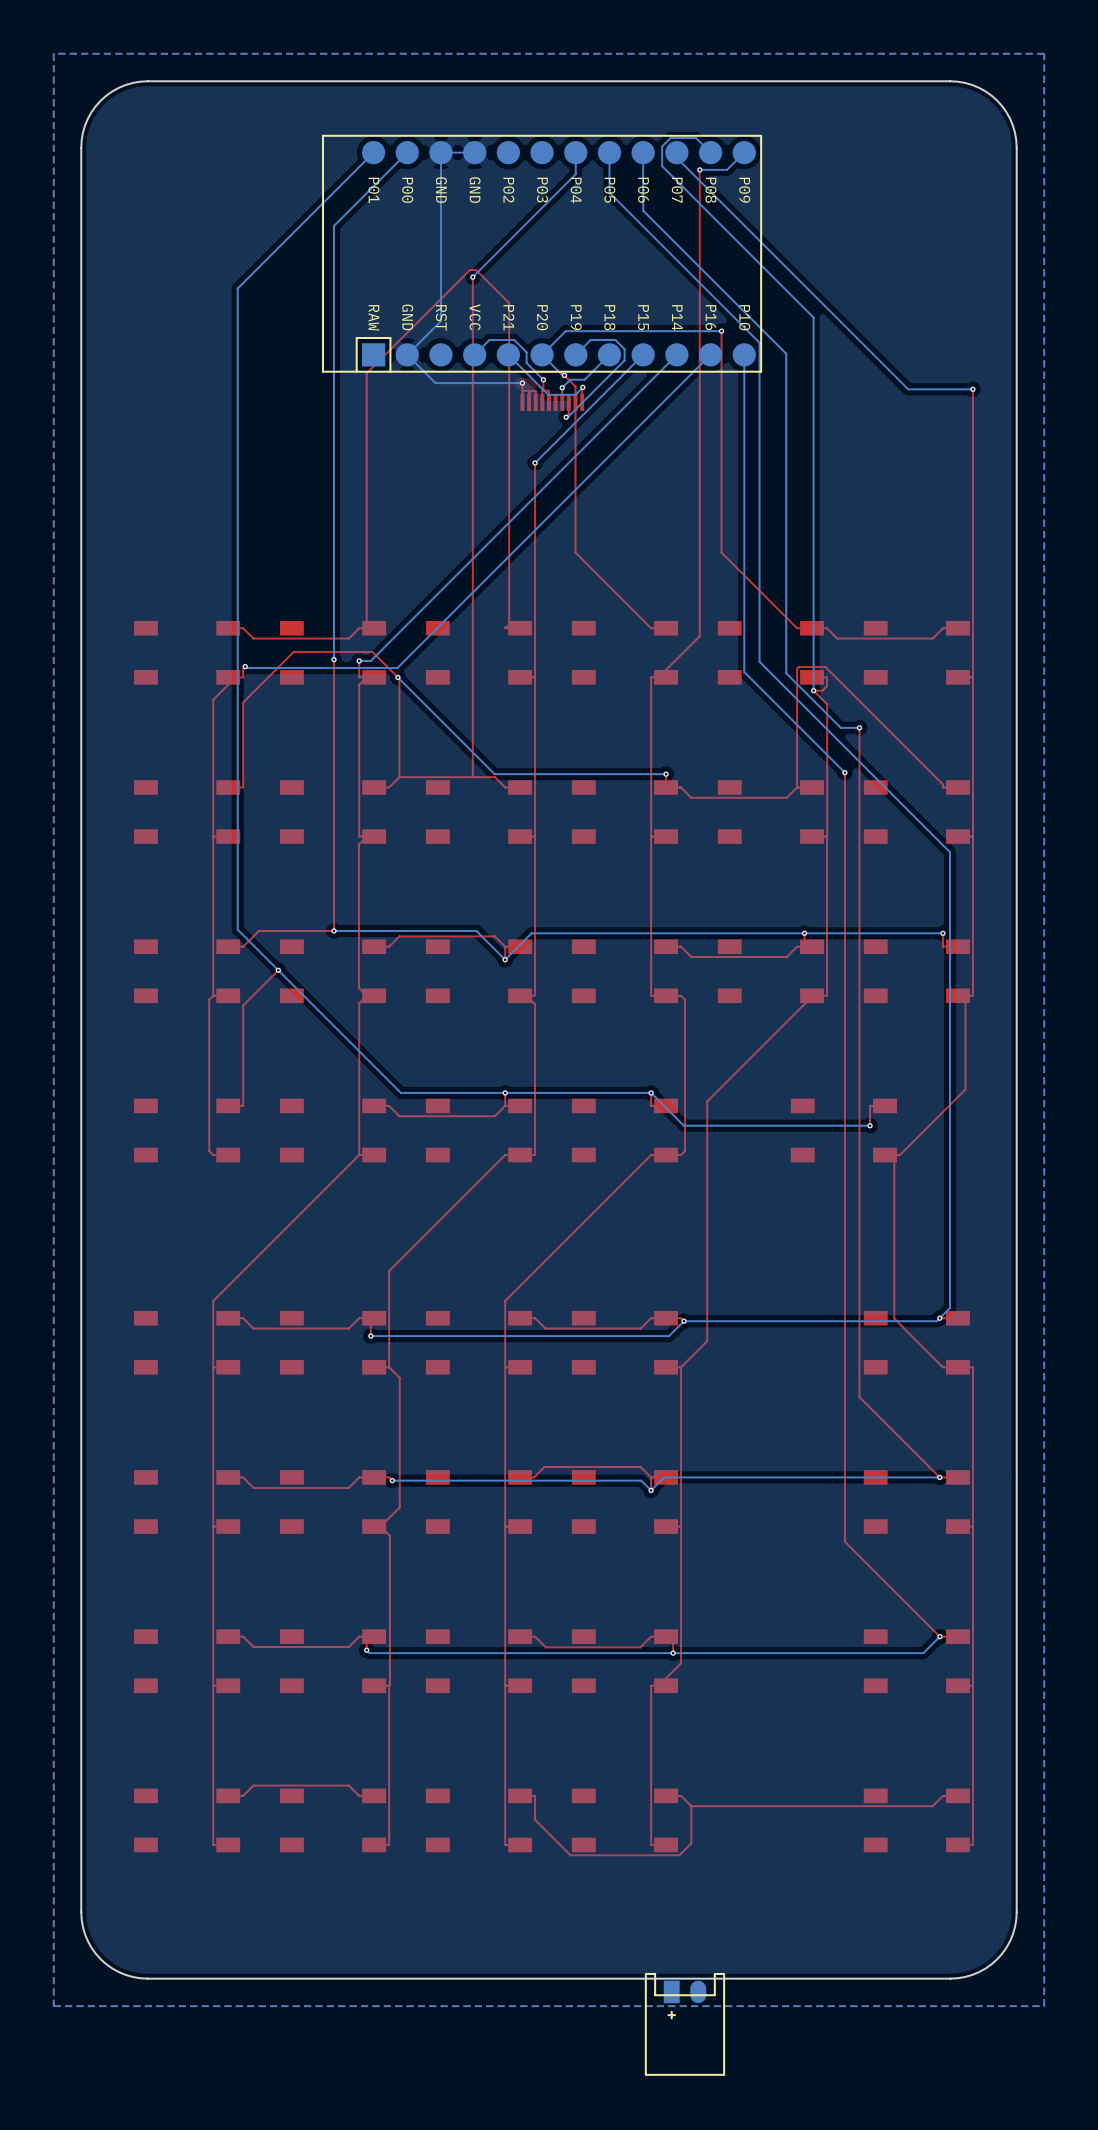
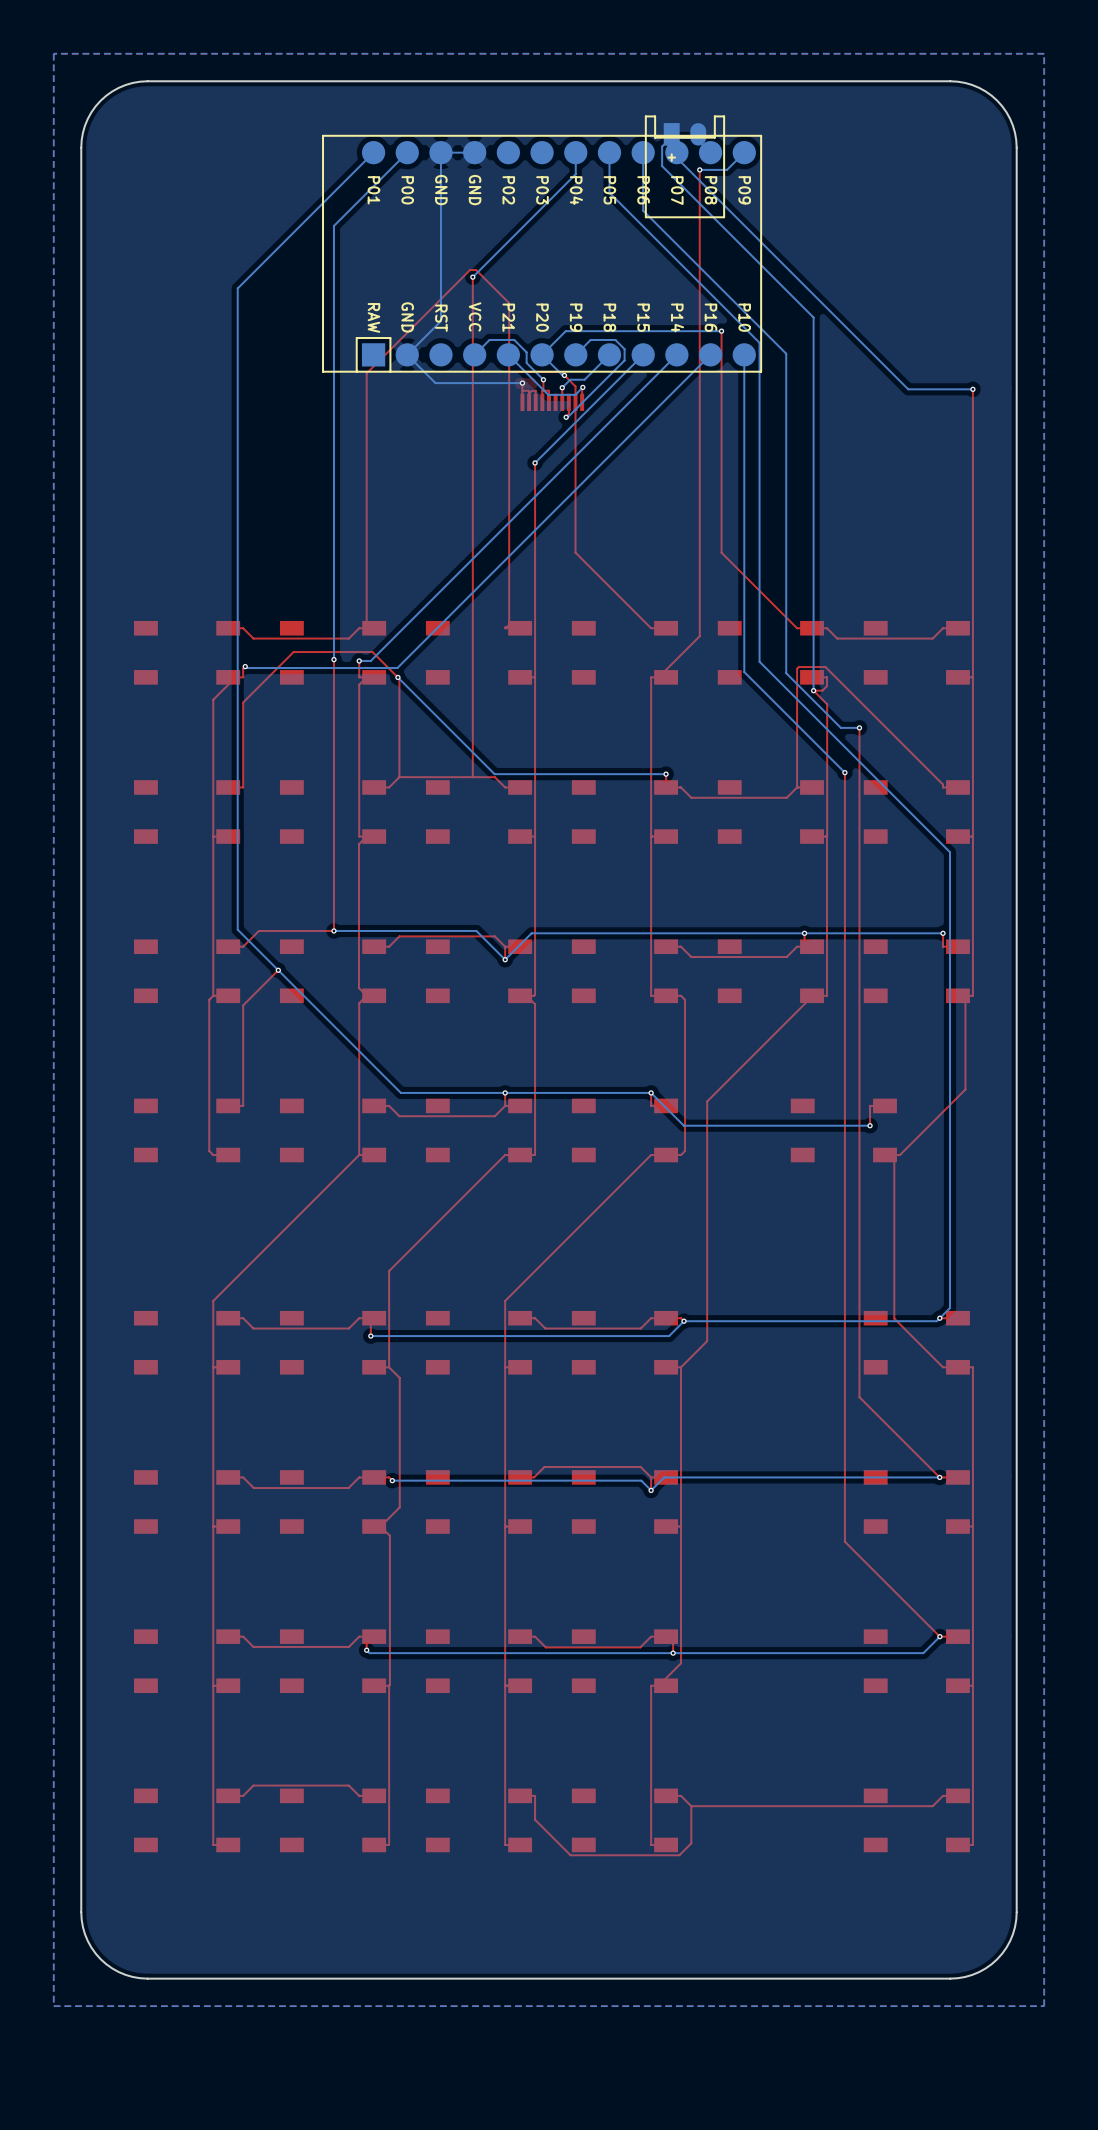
part: none -> (684, 166)
part: (684, 2024) -> none

